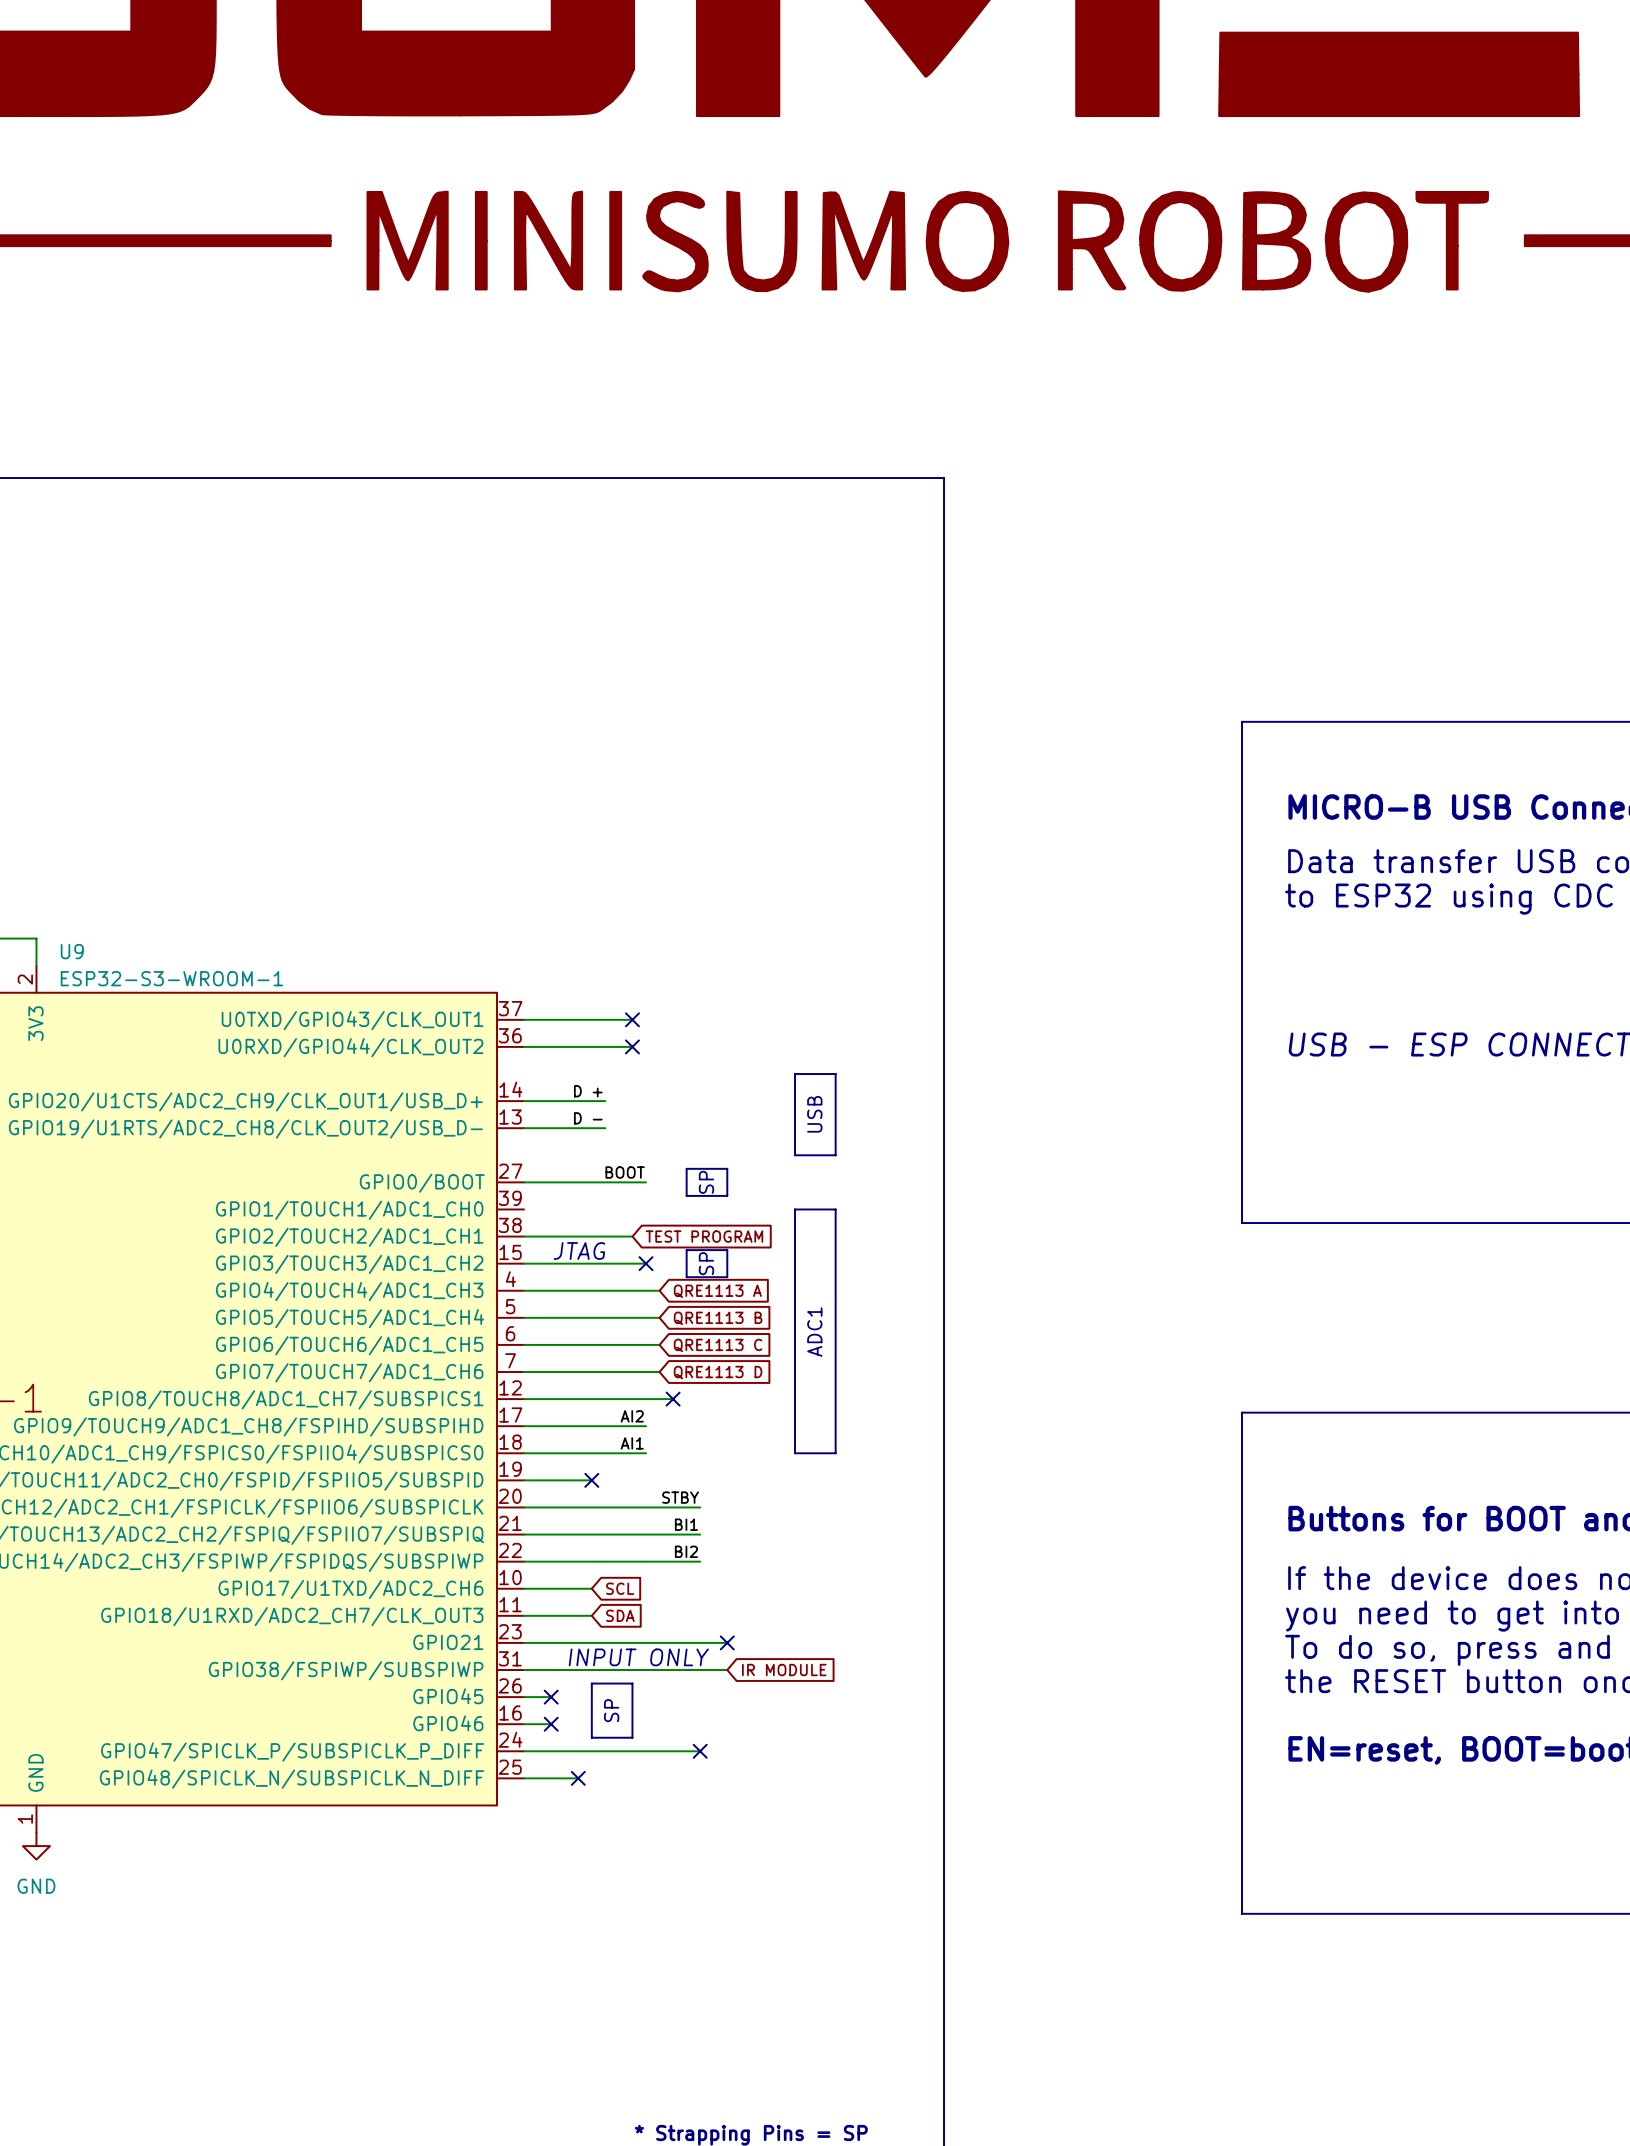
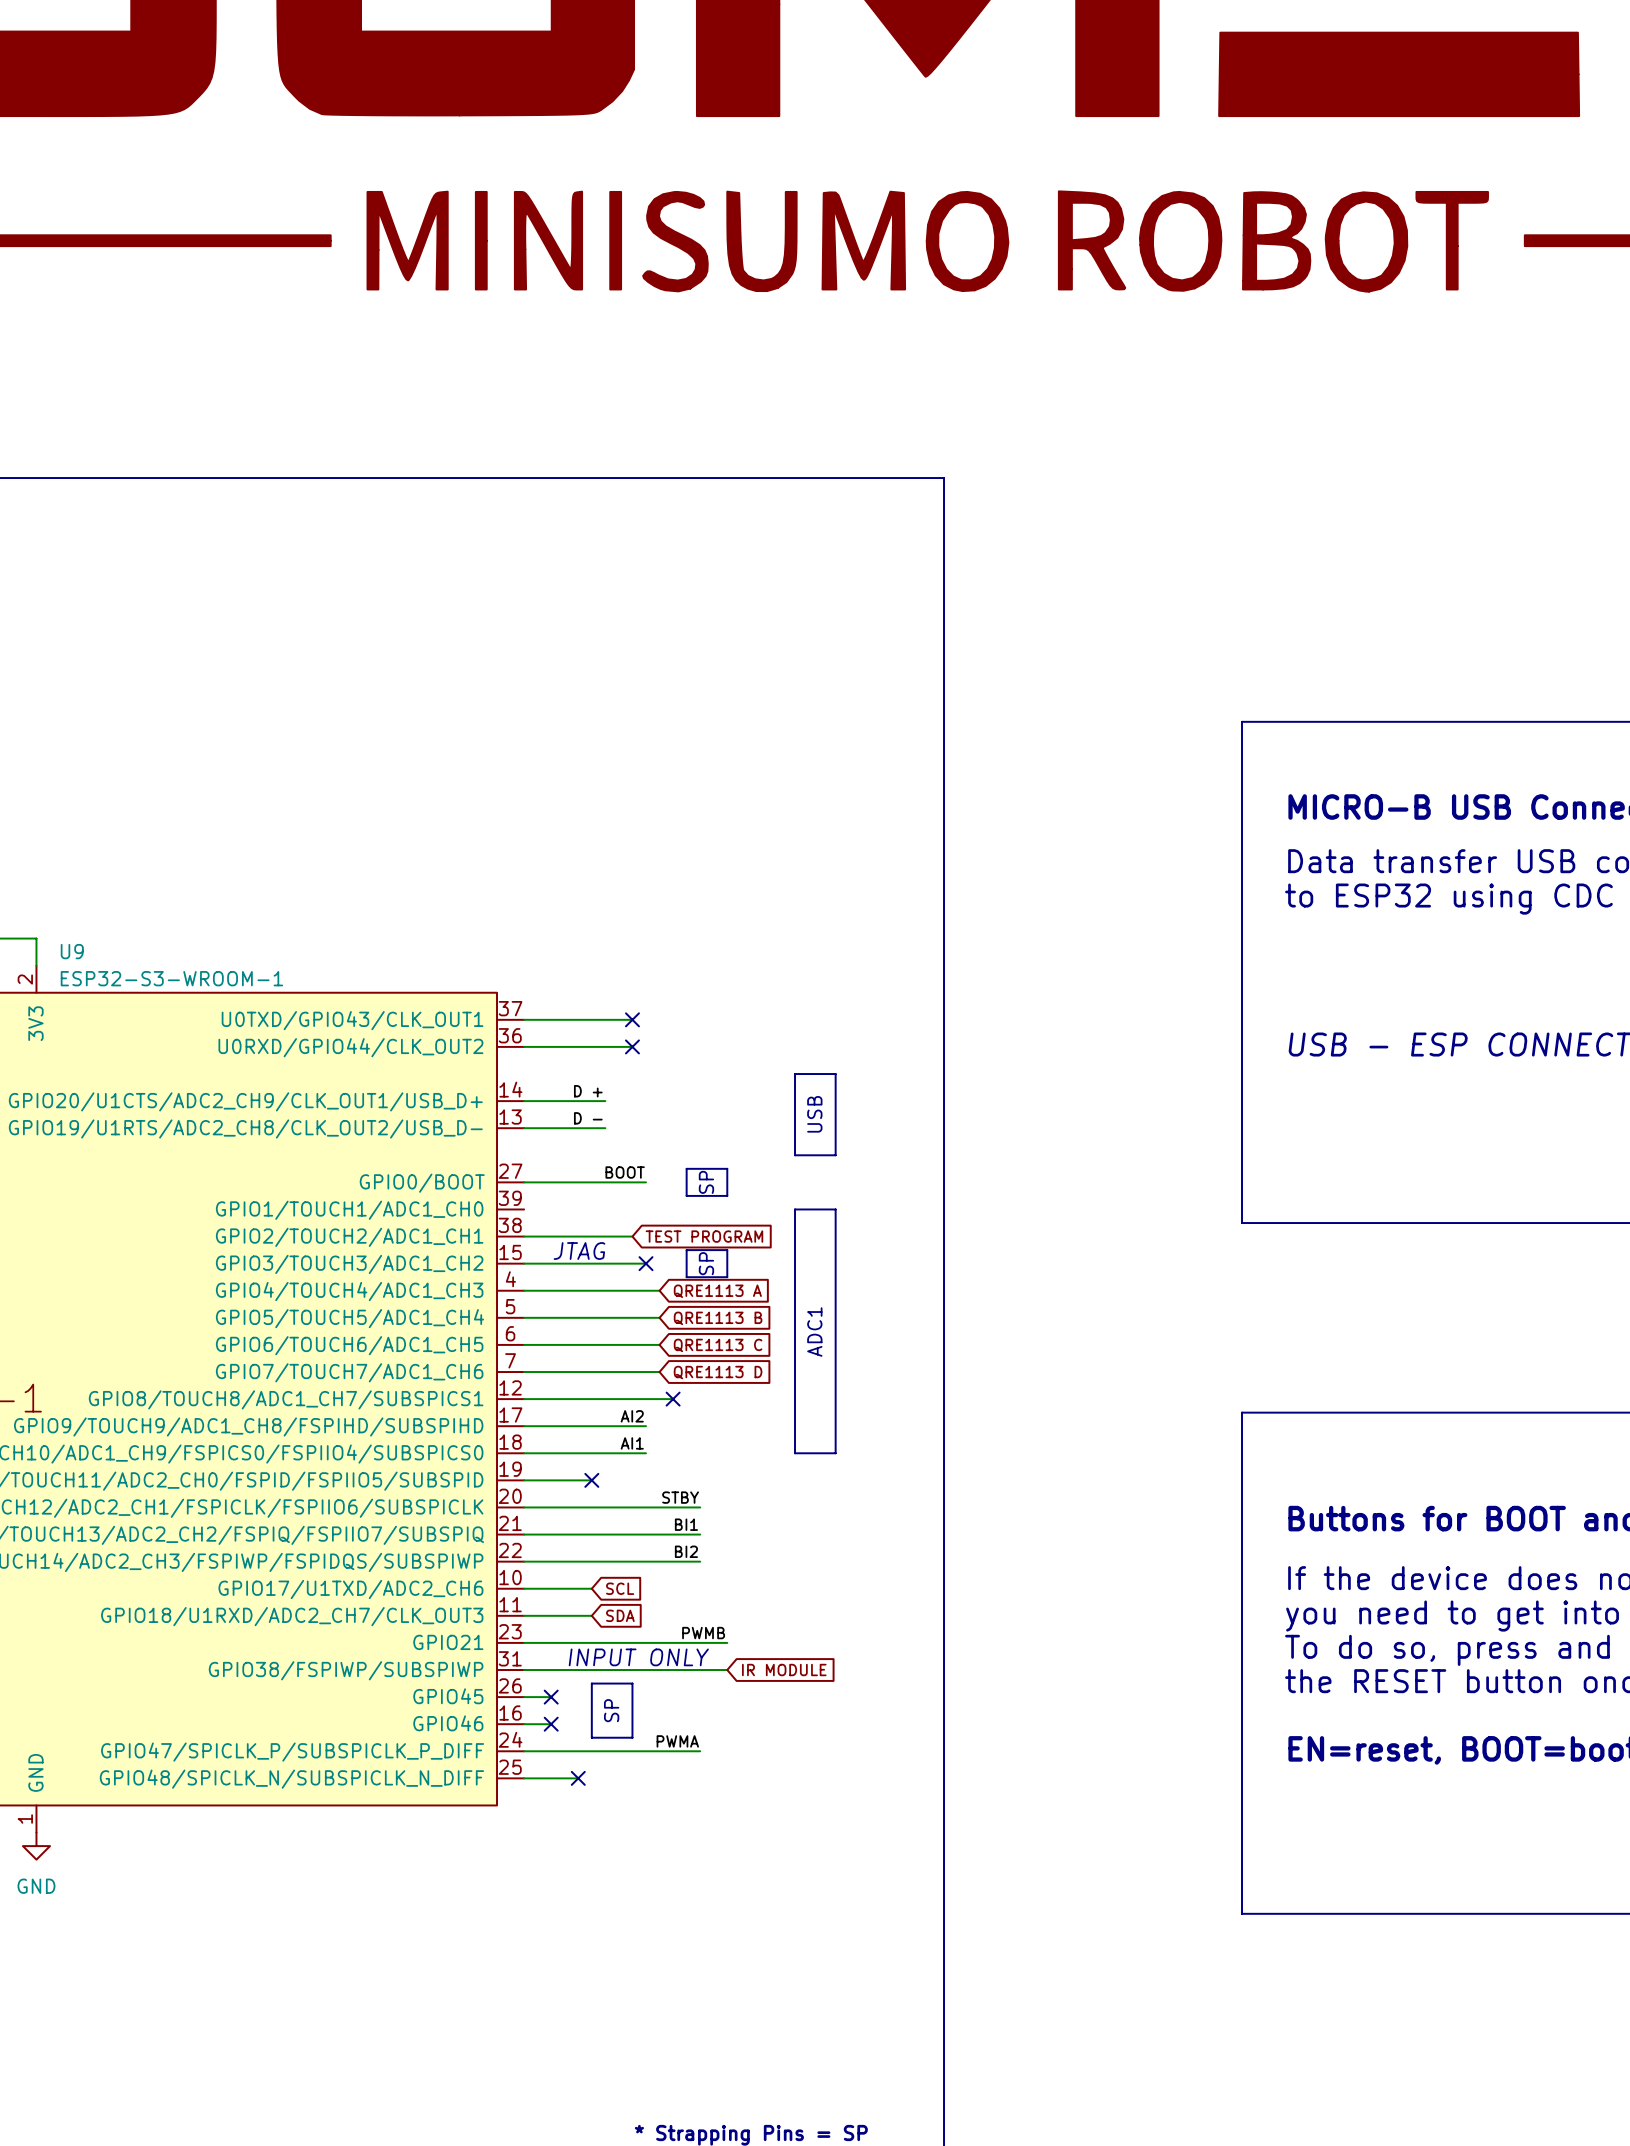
label: none -> PWMB (703, 1633)
no-connect mark: (727, 1642) -> none
label: none -> PWMA (677, 1741)
no-connect mark: (700, 1751) -> none

